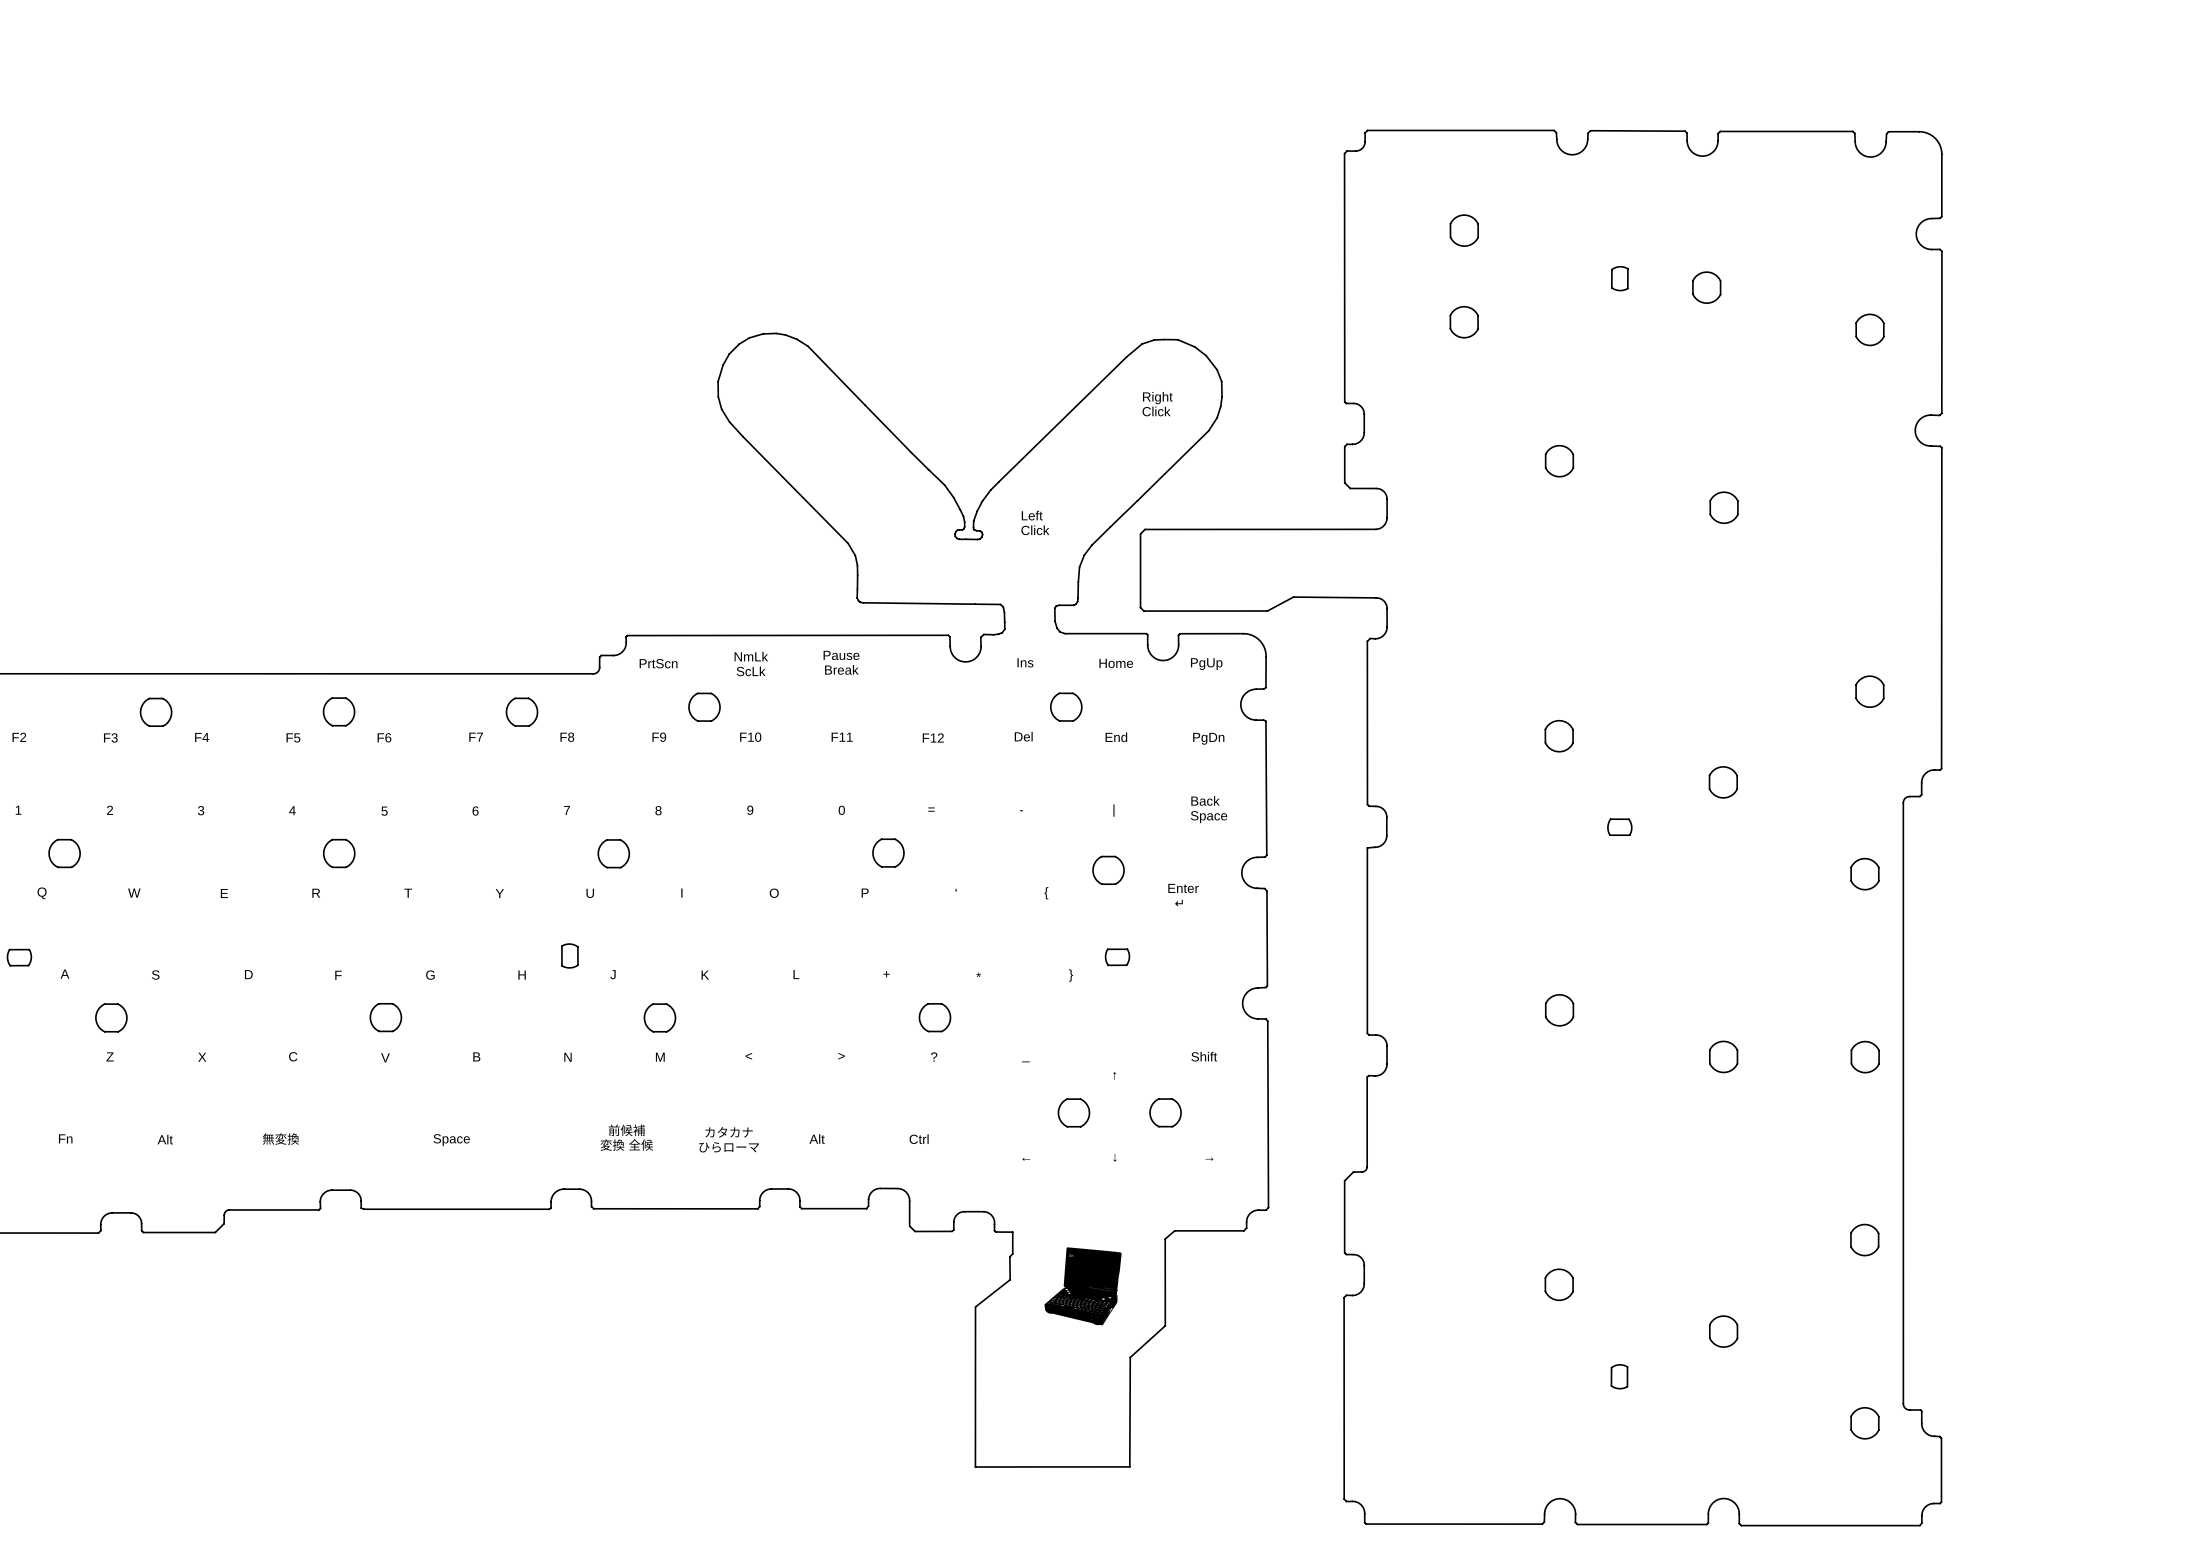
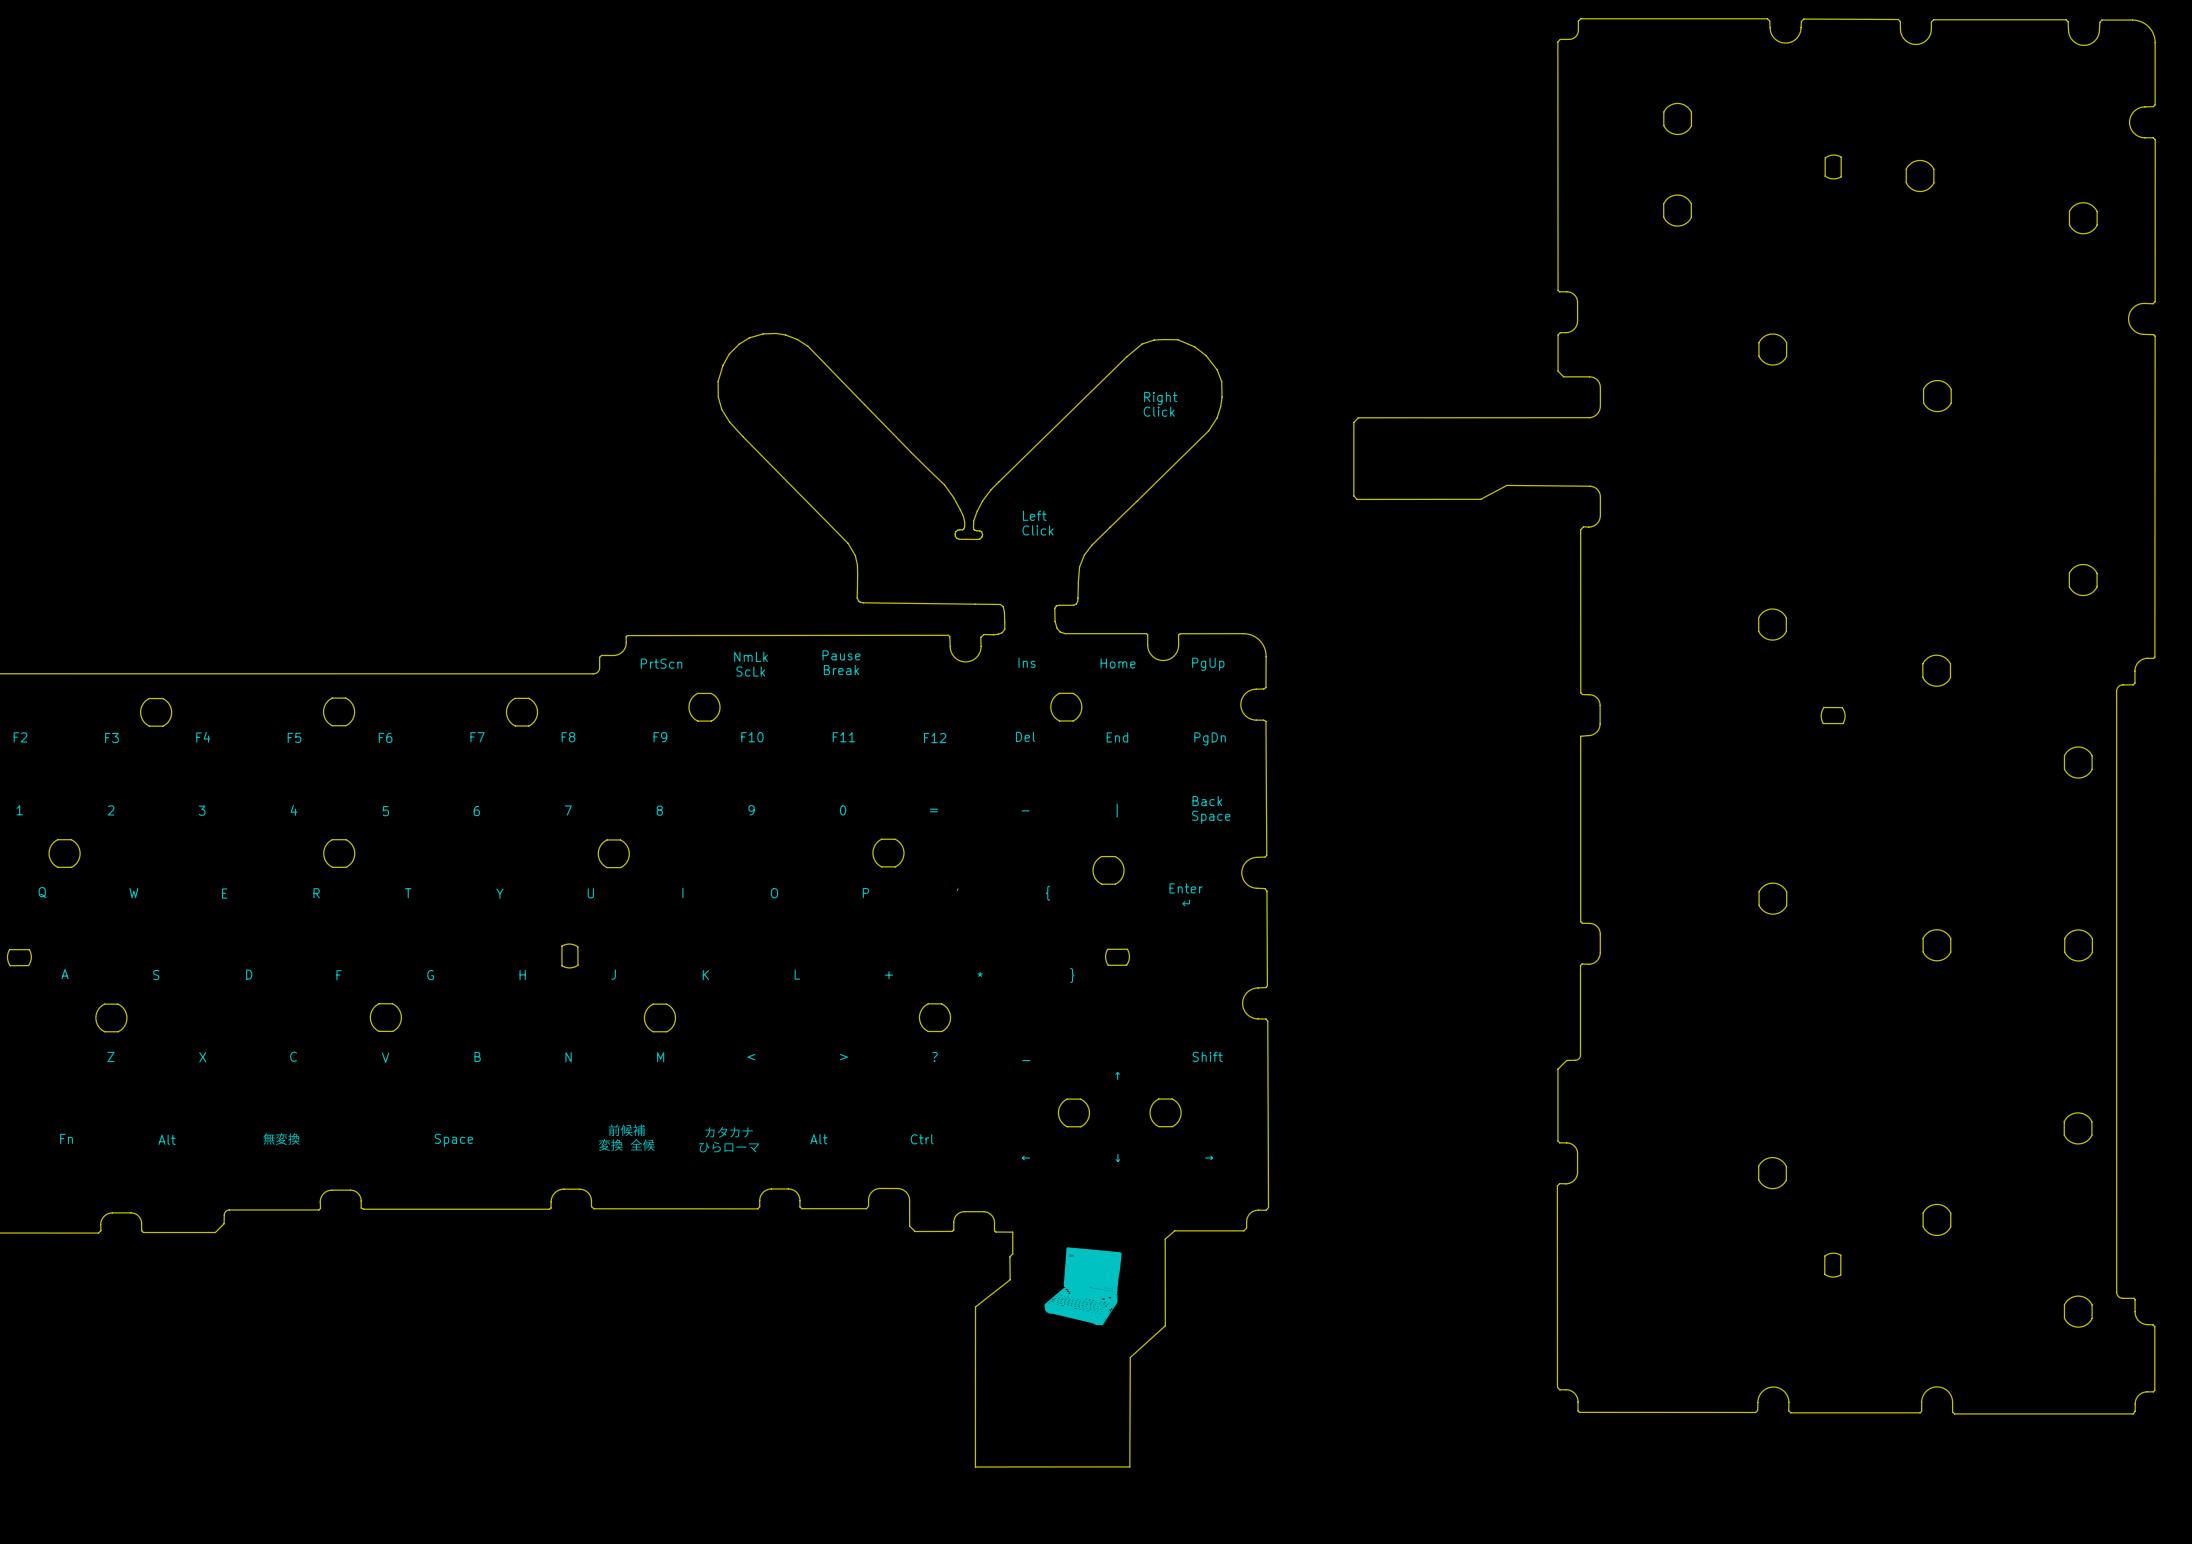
board edge: none -> (1663, 112) (1663, 125) (1670, 132) (1683, 133) (1691, 125) (1691, 112) (1685, 105) (1673, 103) (1663, 112)
board edge: none -> (1825, 157) (1833, 155) (1841, 157) (1841, 176) (1833, 178) (1825, 176) (1825, 157)
board edge: none -> (1906, 169) (1906, 182) (1912, 189) (1923, 191) (1933, 182) (1933, 169) (1927, 162) (1916, 160) (1906, 169)
board edge: none -> (2069, 211) (2069, 224) (2075, 231) (2088, 232) (2097, 225) (2097, 211) (2090, 204) (2077, 203) (2069, 211)
board edge: (1450, 223) (1450, 237) (1456, 244) (1468, 245) (1478, 237) (1478, 223) (1471, 217) (1460, 215) (1450, 223) -> none
board edge: (1611, 269) (1611, 287) (1619, 290) (1627, 288) (1627, 268) (1619, 266) (1611, 269) -> none
board edge: (1692, 280) (1692, 294) (1699, 301) (1710, 302) (1720, 294) (1720, 281) (1714, 274) (1703, 272) (1692, 280) -> (1663, 203) (1663, 217) (1670, 224) (1681, 225) (1691, 217) (1691, 203) (1684, 196) (1671, 196) (1663, 203)
board edge: (1450, 315) (1450, 328) (1456, 335) (1467, 337) (1478, 329) (1478, 315) (1471, 308) (1460, 307) (1450, 315) -> none
board edge: (1856, 323) (1856, 336) (1862, 343) (1873, 344) (1883, 336) (1883, 323) (1877, 316) (1866, 314) (1856, 323) -> (1923, 389) (1923, 402) (1930, 409) (1942, 410) (1951, 402) (1951, 389) (1944, 382) (1933, 381) (1923, 389)
board edge: none -> (1758, 342) (1758, 356) (1765, 363) (1776, 364) (1786, 356) (1786, 342) (1780, 335) (1769, 334) (1758, 342)
board edge: none -> (1589, 376) (1597, 379) (1600, 387) (1600, 408) (1596, 415) (1590, 417) (1358, 417) (1353, 422) (1353, 495) (1357, 499) (1480, 499) (1506, 485) (1590, 486) (1597, 489) (1600, 494) (1599, 520) (1593, 525) (1583, 526) (1580, 529) (1580, 692) (1595, 696) (1600, 705) (1598, 730) (1592, 734) (1580, 736) (1580, 921) (1593, 923) (1598, 928) (1600, 952) (1594, 962) (1580, 965) (1580, 1056) (1576, 1060) (1566, 1060) (1557, 1069) (1557, 1141) (1570, 1143) (1575, 1147) (1577, 1172) (1572, 1182) (1559, 1183) (1557, 1186) (1557, 1387) (1559, 1389) (1569, 1390) (1575, 1394) (1579, 1412) (1755, 1412) (1761, 1393) (1767, 1388) (1773, 1387) (1779, 1388) (1785, 1393) (1788, 1400) (1788, 1410) (1790, 1412) (1920, 1412) (1923, 1394) (1929, 1388) (1937, 1386) (1944, 1388) (1950, 1394) (1952, 1411) (1954, 1413) (2133, 1413) (2138, 1395) (2154, 1390) (2154, 1326) (2143, 1323) (2137, 1319) (2135, 1314) (2134, 1298) (2120, 1297) (2116, 1292) (2116, 691) (2120, 685) (2133, 684) (2134, 683) (2135, 668) (2138, 661) (2154, 657) (2155, 336) (2136, 332) (2130, 326) (2128, 318) (2130, 311) (2136, 305) (2153, 303) (2155, 301) (2155, 139) (2135, 134) (2130, 128) (2129, 122) (2130, 116) (2135, 110) (2155, 104) (2155, 42) (2151, 30) (2144, 23) (2137, 20) (2101, 20) (2096, 38) (2091, 43) (2083, 45) (2076, 43) (2071, 38) (2066, 19) (1933, 19) (1931, 21) (1928, 37) (1923, 42) (1915, 44) (1908, 42) (1903, 37) (1898, 19) (1803, 19) (1801, 21) (1798, 36) (1792, 41) (1785, 43) (1778, 41) (1772, 36) (1769, 21) (1767, 18) (1580, 18) (1578, 21) (1578, 32) (1575, 36) (1571, 39) (1560, 39) (1557, 41) (1558, 290) (1572, 293) (1577, 302) (1575, 327) (1570, 331) (1560, 332) (1558, 334) (1558, 371) (1563, 376) (1589, 376)
board edge: (1545, 454) (1545, 467) (1552, 474) (1563, 476) (1573, 468) (1573, 454) (1566, 447) (1555, 446) (1545, 454) -> none
board edge: (1376, 488) (1383, 491) (1387, 499) (1386, 520) (1383, 525) (1377, 529) (1145, 529) (1140, 534) (1140, 607) (1143, 611) (1267, 611) (1293, 597) (1377, 597) (1383, 600) (1386, 606) (1385, 632) (1380, 637) (1370, 638) (1367, 641) (1367, 804) (1381, 807) (1386, 817) (1385, 841) (1378, 846) (1367, 847) (1367, 1033) (1379, 1035) (1385, 1040) (1386, 1064) (1381, 1074) (1367, 1077) (1366, 1168) (1363, 1171) (1353, 1172) (1344, 1180) (1344, 1252) (1356, 1255) (1362, 1259) (1364, 1283) (1358, 1293) (1346, 1295) (1344, 1297) (1344, 1499) (1346, 1501) (1356, 1502) (1362, 1506) (1366, 1524) (1542, 1524) (1547, 1504) (1552, 1500) (1560, 1498) (1567, 1500) (1572, 1504) (1575, 1512) (1575, 1522) (1577, 1524) (1706, 1524) (1710, 1506) (1716, 1500) (1723, 1498) (1731, 1500) (1737, 1506) (1739, 1523) (1741, 1525) (1919, 1525) (1921, 1515) -> none
board edge: (1376, 488) (1350, 488) (1344, 482) (1344, 446) (1347, 444) (1357, 443) (1362, 438) (1364, 414) (1359, 405) (1344, 402) (1344, 153) (1347, 151) (1357, 150) (1362, 148) (1364, 143) (1365, 132) (1367, 130) (1554, 130) (1556, 132) (1559, 148) (1565, 153) (1572, 154) (1579, 153) (1584, 148) (1588, 133) (1590, 130) (1685, 131) (1689, 149) (1695, 154) (1702, 156) (1709, 154) (1715, 149) (1718, 133) (1720, 131) (1852, 131) (1857, 150) (1863, 155) (1870, 157) (1877, 155) (1883, 150) (1888, 131) (1924, 132) (1933, 136) (1938, 142) (1941, 154) (1941, 216) (1922, 221) (1918, 226) (1916, 234) (1918, 241) (1922, 246) (1941, 251) (1941, 413) (1939, 415) (1922, 417) (1917, 422) (1915, 430) (1917, 438) (1922, 443) (1941, 447) (1941, 768) (1925, 773) (1921, 779) (1921, 794) (1919, 796) (1906, 797) (1903, 802) (1903, 1404) (1907, 1409) (1920, 1409) (1922, 1426) (1924, 1431) (1930, 1435) (1941, 1438) (1941, 1502) (1926, 1506) (1921, 1515) -> none
board edge: (1710, 500) (1710, 514) (1716, 521) (1727, 522) (1737, 514) (1737, 501) (1731, 494) (1720, 492) (1710, 500) -> (1758, 617) (1758, 631) (1765, 638) (1778, 639) (1786, 631) (1786, 617) (1779, 610) (1766, 610) (1758, 617)
board edge: none -> (2069, 573) (2069, 586) (2075, 593) (2086, 595) (2097, 586) (2097, 573) (2090, 566) (2079, 564) (2069, 573)
board edge: (1856, 684) (1856, 698) (1862, 705) (1873, 706) (1883, 698) (1883, 685) (1877, 678) (1866, 676) (1856, 684) -> (1922, 663) (1922, 677) (1929, 684) (1942, 685) (1950, 677) (1950, 664) (1944, 657) (1931, 656) (1922, 663)
board edge: none -> (1842, 707) (1823, 707) (1821, 715) (1823, 723) (1843, 723) (1845, 715) (1842, 707)
board edge: (1545, 729) (1545, 742) (1551, 749) (1562, 751) (1573, 743) (1573, 729) (1566, 722) (1555, 721) (1545, 729) -> none
board edge: none -> (2064, 755) (2064, 769) (2070, 776) (2082, 777) (2092, 769) (2092, 755) (2085, 748) (2072, 748) (2064, 755)
board edge: (1709, 775) (1709, 789) (1715, 795) (1727, 797) (1737, 789) (1737, 775) (1730, 768) (1719, 767) (1709, 775) -> none
board edge: (1610, 819) (1628, 819) (1631, 827) (1629, 835) (1610, 835) (1607, 827) (1610, 819) -> none
board edge: (1851, 867) (1851, 880) (1857, 887) (1868, 889) (1878, 881) (1878, 867) (1872, 860) (1861, 859) (1851, 867) -> (1759, 891) (1759, 905) (1765, 912) (1778, 913) (1786, 905) (1786, 892) (1780, 885) (1767, 884) (1759, 891)
board edge: none -> (2064, 938) (2064, 952) (2071, 959) (2082, 960) (2092, 952) (2092, 938) (2085, 931) (2072, 930) (2064, 938)
board edge: (1545, 1003) (1545, 1016) (1552, 1023) (1563, 1025) (1573, 1017) (1573, 1003) (1566, 996) (1555, 995) (1545, 1003) -> none
board edge: (1709, 1050) (1709, 1063) (1716, 1070) (1727, 1072) (1737, 1063) (1737, 1050) (1731, 1043) (1719, 1041) (1709, 1050) -> (1758, 1166) (1758, 1179) (1765, 1186) (1776, 1188) (1786, 1179) (1786, 1166) (1779, 1159) (1766, 1158) (1758, 1166)
board edge: (1851, 1050) (1851, 1063) (1857, 1070) (1869, 1072) (1879, 1063) (1879, 1050) (1872, 1043) (1861, 1042) (1851, 1050) -> (1923, 938) (1923, 951) (1929, 958) (1940, 960) (1950, 952) (1950, 938) (1944, 931) (1933, 930) (1923, 938)
board edge: none -> (2064, 1121) (2064, 1135) (2070, 1142) (2083, 1142) (2091, 1135) (2091, 1121) (2085, 1114) (2074, 1113) (2064, 1121)
board edge: (1850, 1233) (1850, 1246) (1857, 1253) (1868, 1255) (1878, 1246) (1878, 1233) (1872, 1226) (1861, 1225) (1850, 1233) -> (1923, 1213) (1923, 1226) (1929, 1233) (1940, 1235) (1950, 1226) (1950, 1213) (1944, 1206) (1933, 1204) (1923, 1213)
board edge: none -> (1824, 1255) (1824, 1274) (1832, 1277) (1840, 1274) (1840, 1255) (1832, 1253) (1824, 1256)
board edge: (1545, 1277) (1545, 1291) (1551, 1298) (1562, 1299) (1573, 1291) (1573, 1278) (1566, 1271) (1555, 1269) (1545, 1277) -> none
board edge: none -> (2064, 1304) (2064, 1318) (2070, 1325) (2083, 1326) (2092, 1318) (2092, 1304) (2085, 1298) (2074, 1296) (2064, 1304)
board edge: (1709, 1324) (1709, 1338) (1716, 1345) (1727, 1346) (1737, 1338) (1737, 1324) (1731, 1318) (1719, 1316) (1709, 1324) -> none
board edge: (1611, 1367) (1611, 1385) (1619, 1388) (1627, 1386) (1627, 1366) (1619, 1364) (1611, 1367) -> none
board edge: (1851, 1416) (1851, 1429) (1857, 1436) (1868, 1438) (1878, 1430) (1878, 1416) (1872, 1409) (1861, 1408) (1851, 1416) -> none

